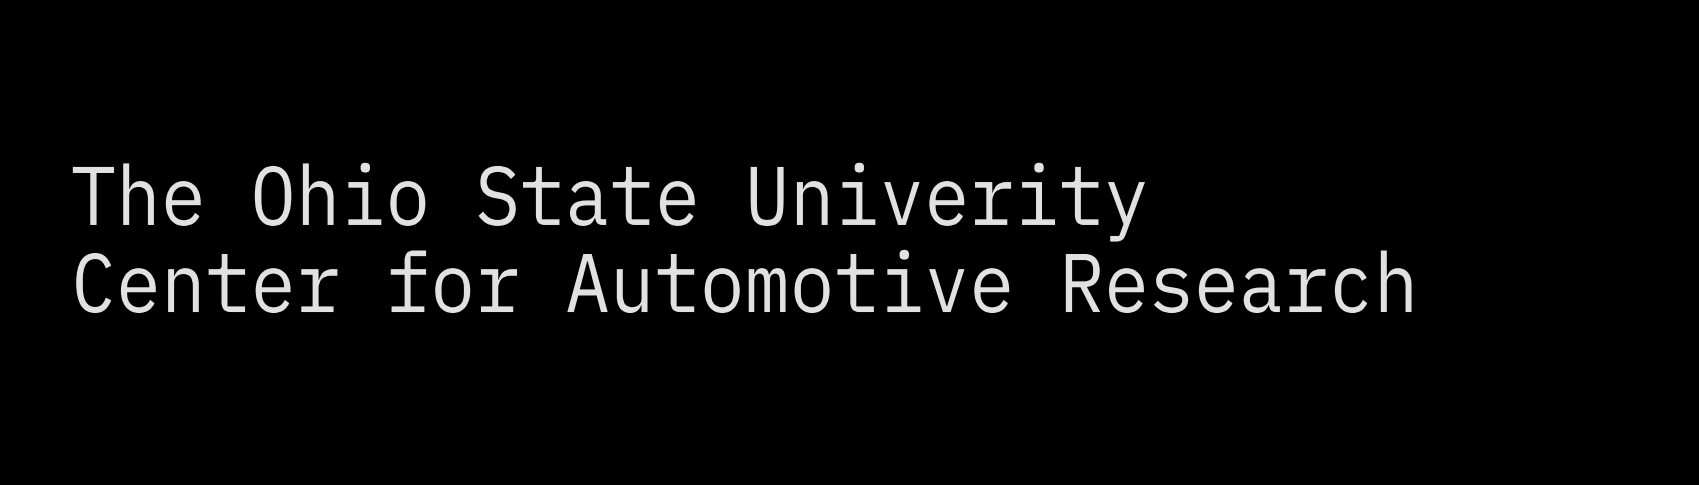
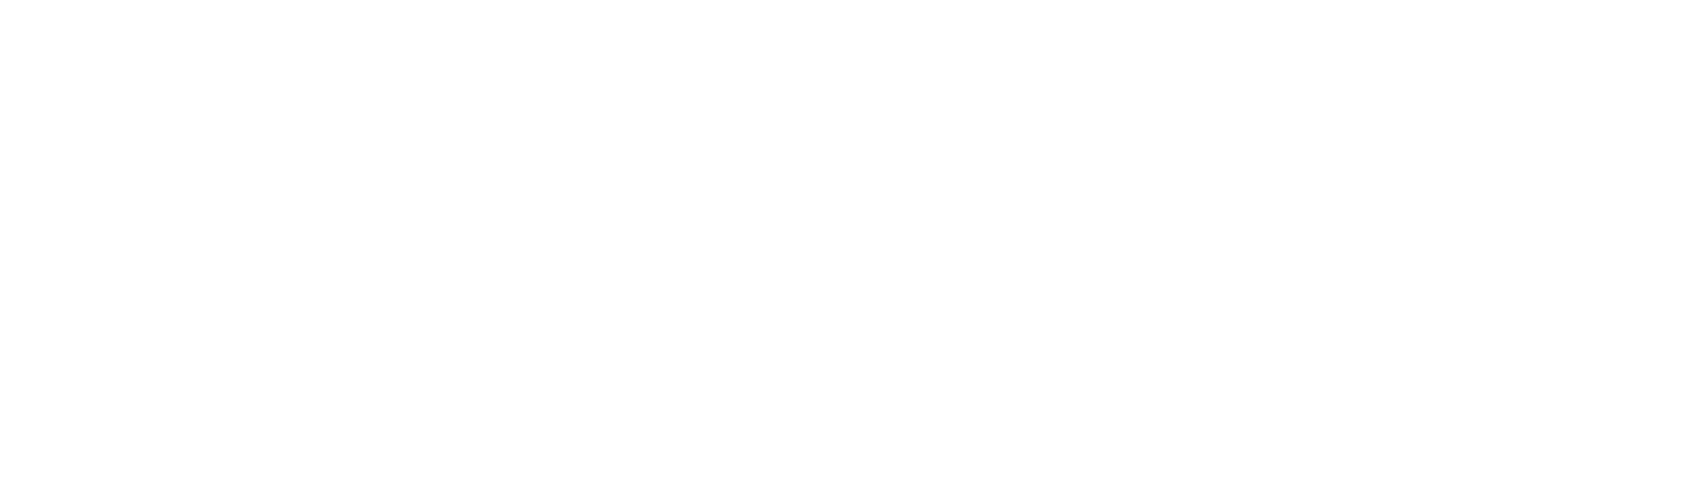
text: The Ohio State Univerity (608, 202) -> none
text: Center for Automotive Research (743, 281) -> none

